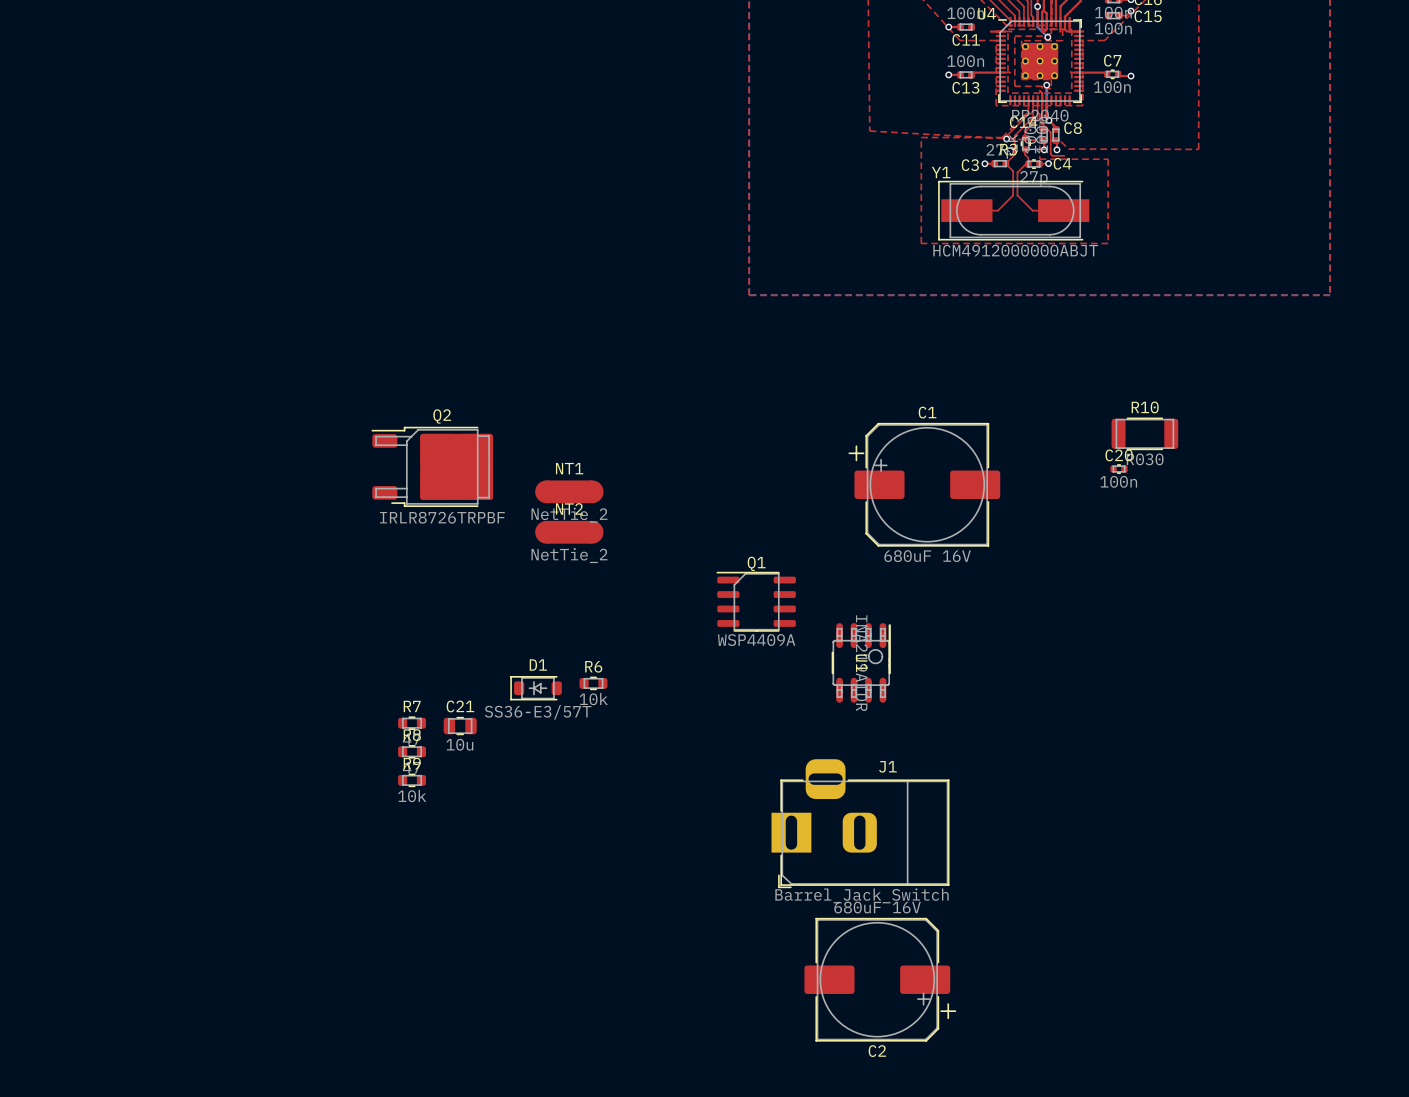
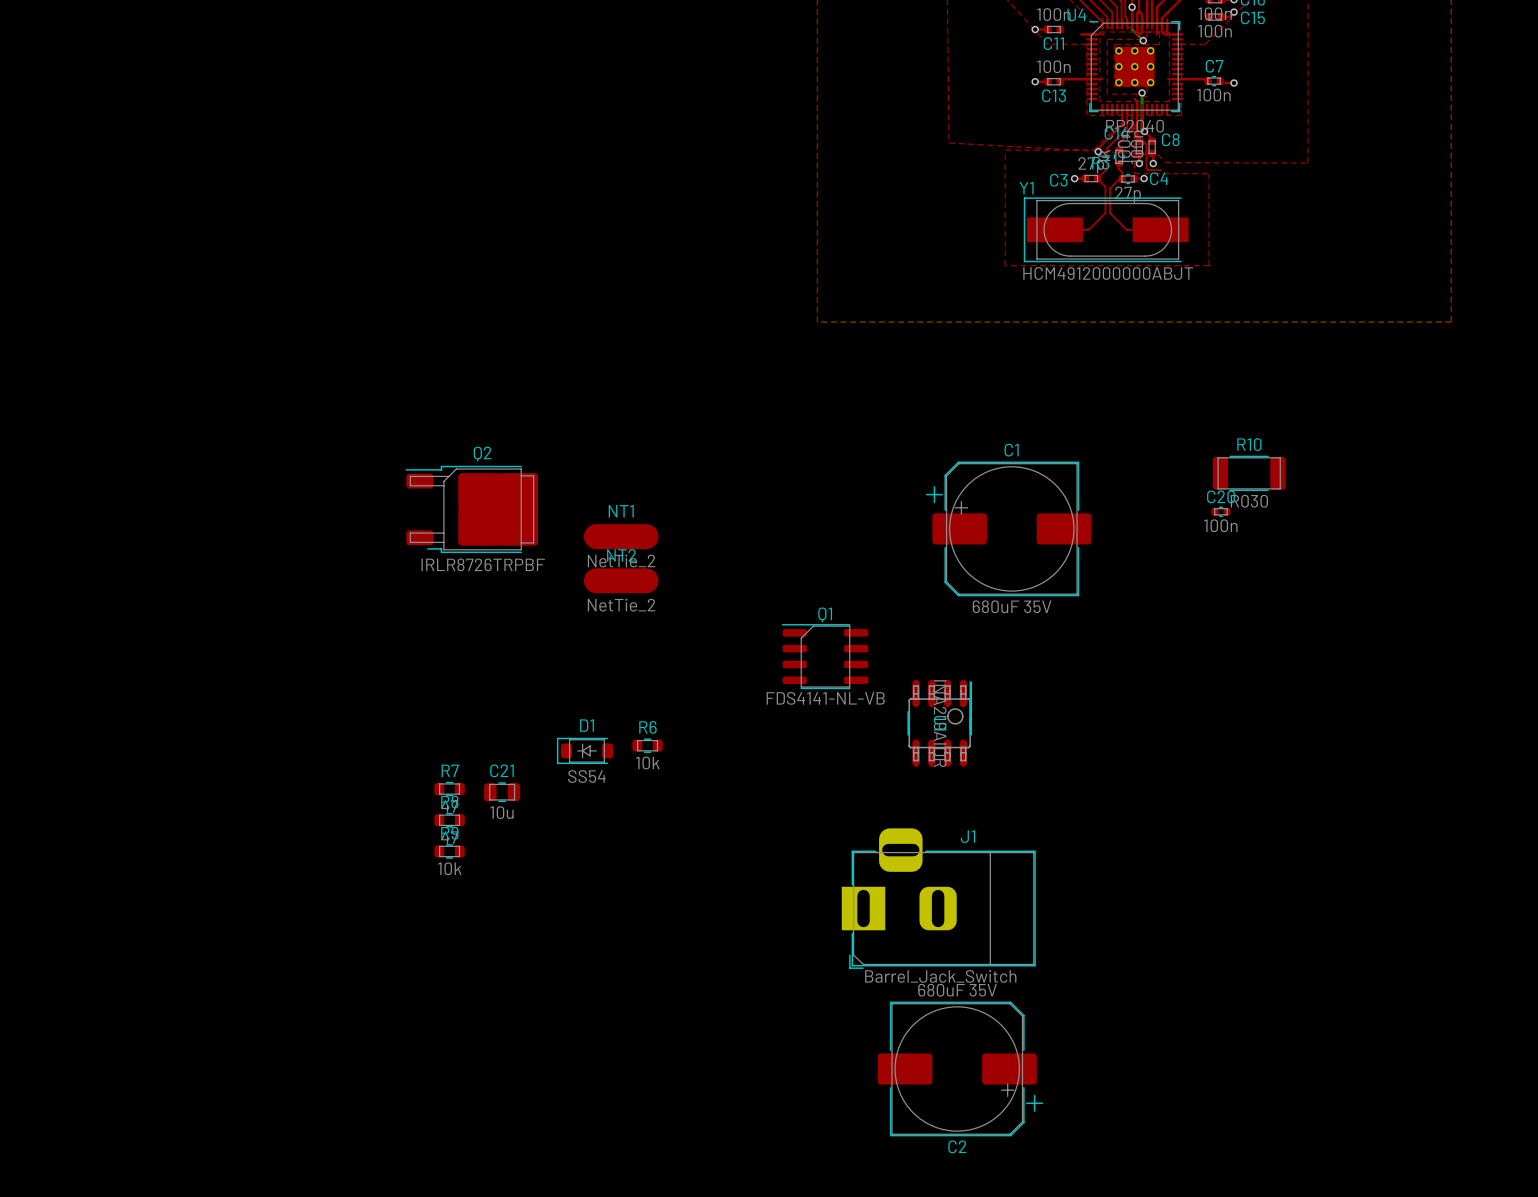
C1 value: 680uF 16V (927, 556) -> 680uF 35V (1012, 606)
Q1 value: WSP4409A (756, 640) -> FDS4141-NL-VB (825, 698)
D1 value: SS36-E3/57T (538, 712) -> SS54 (586, 776)
C2 value: 680uF 16V (877, 907) -> 680uF 35V (957, 990)

